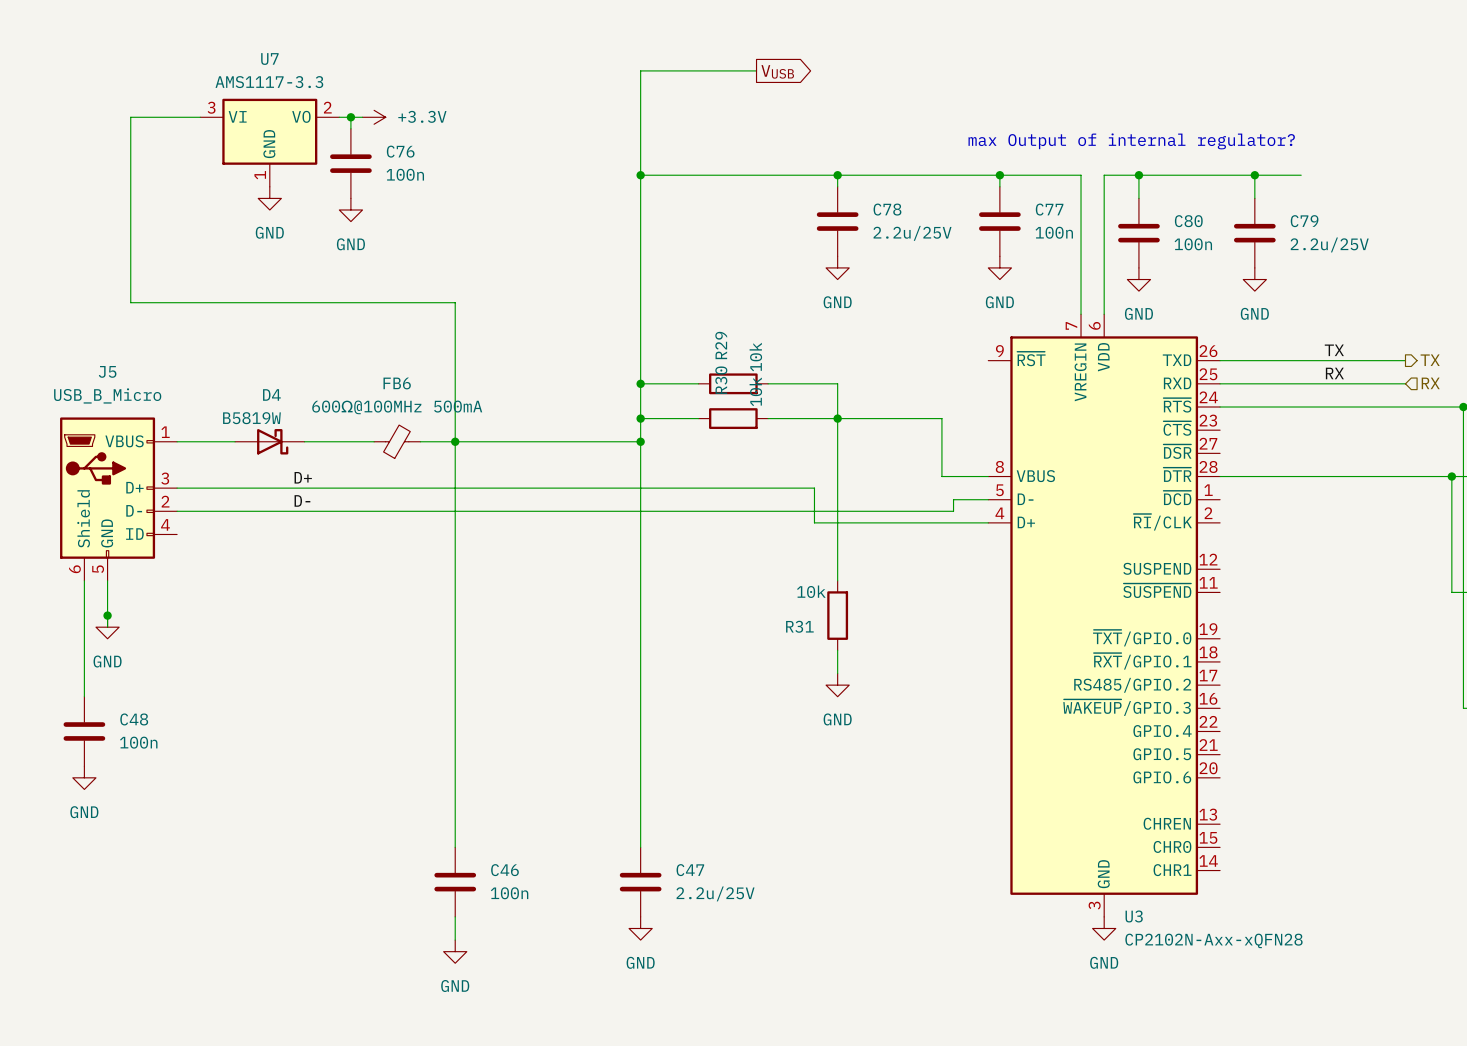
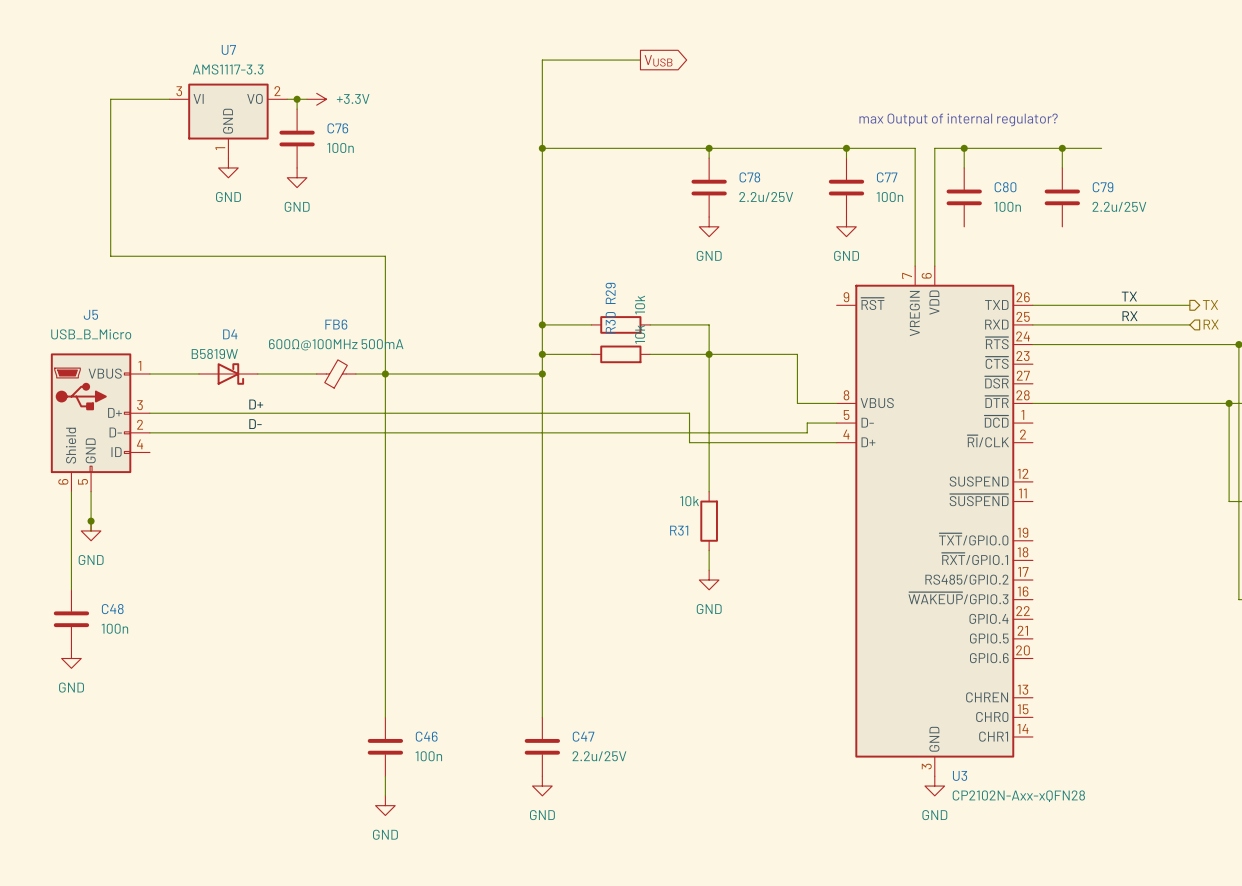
power symbol: GND (1138, 279) -> none
power symbol: GND (1254, 279) -> none

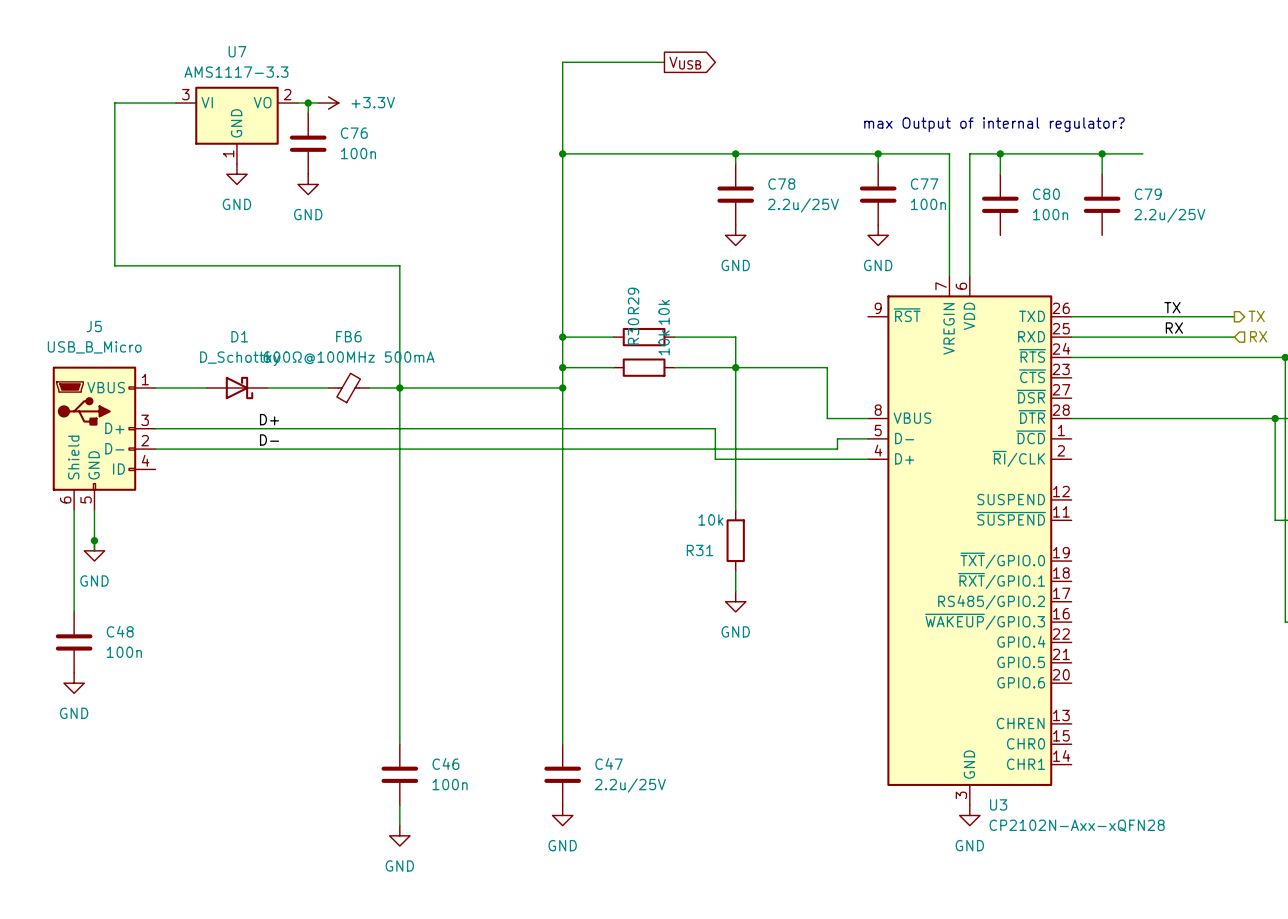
D4 name: D4 (230, 334) -> D1 (239, 336)
D4 value: B5819W (214, 353) -> D_Schottky (240, 358)

